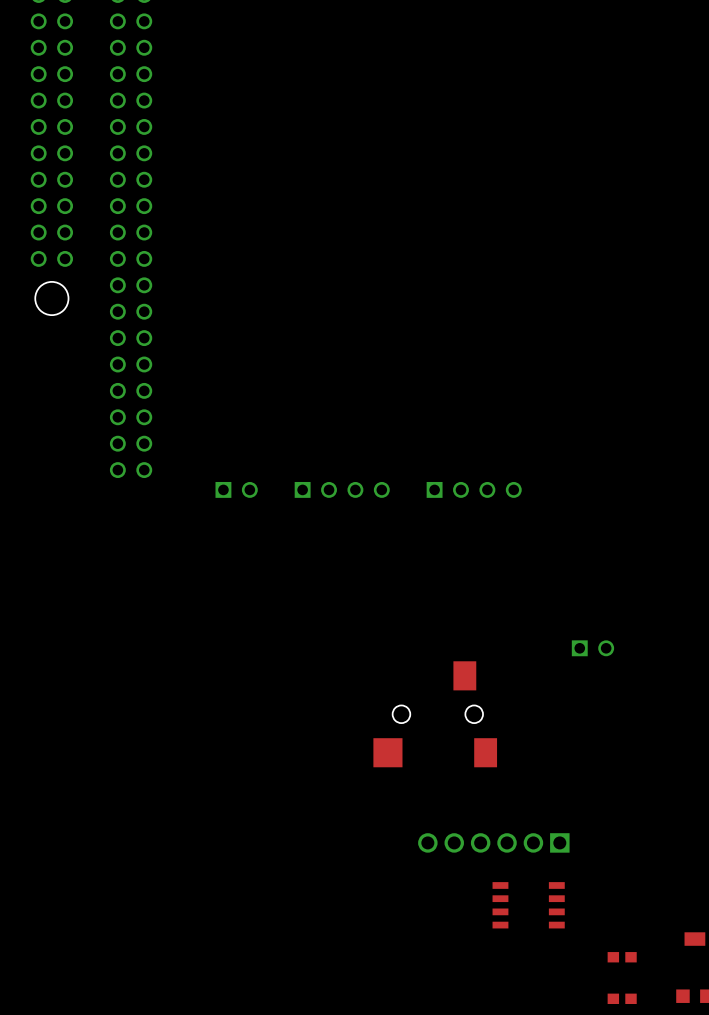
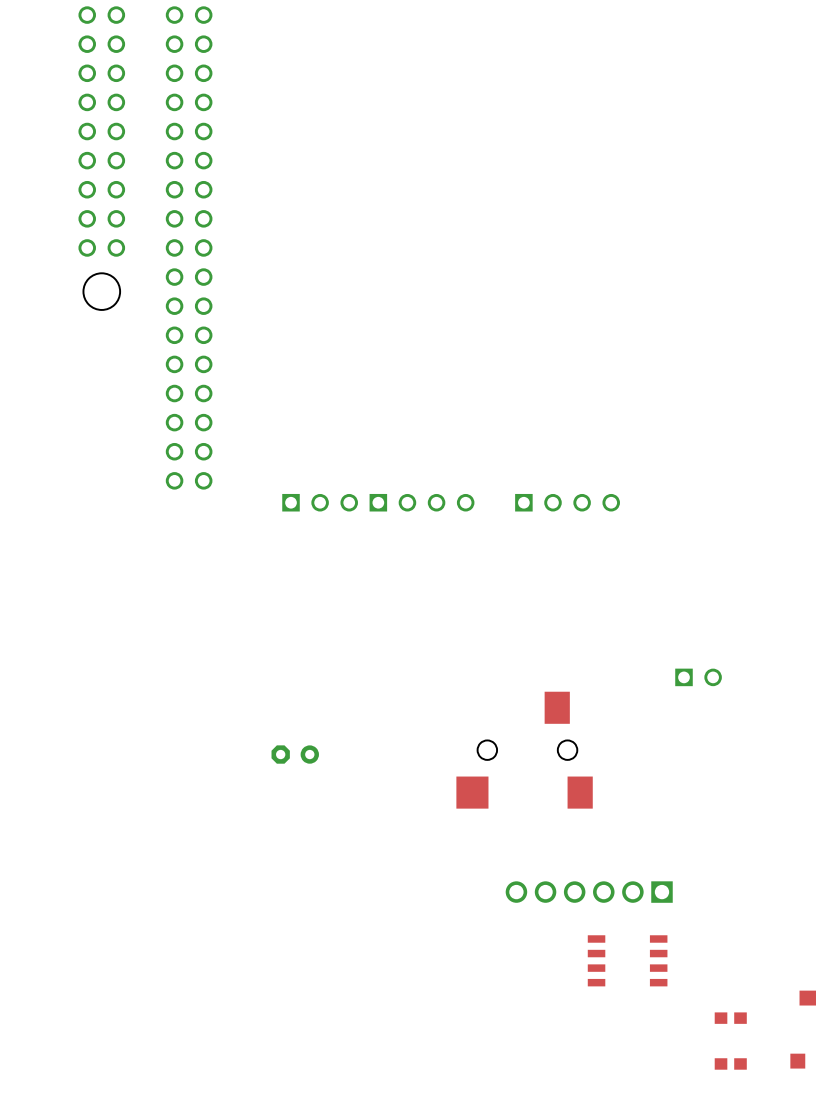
part: none -> (320, 502)
part: none -> (295, 754)

